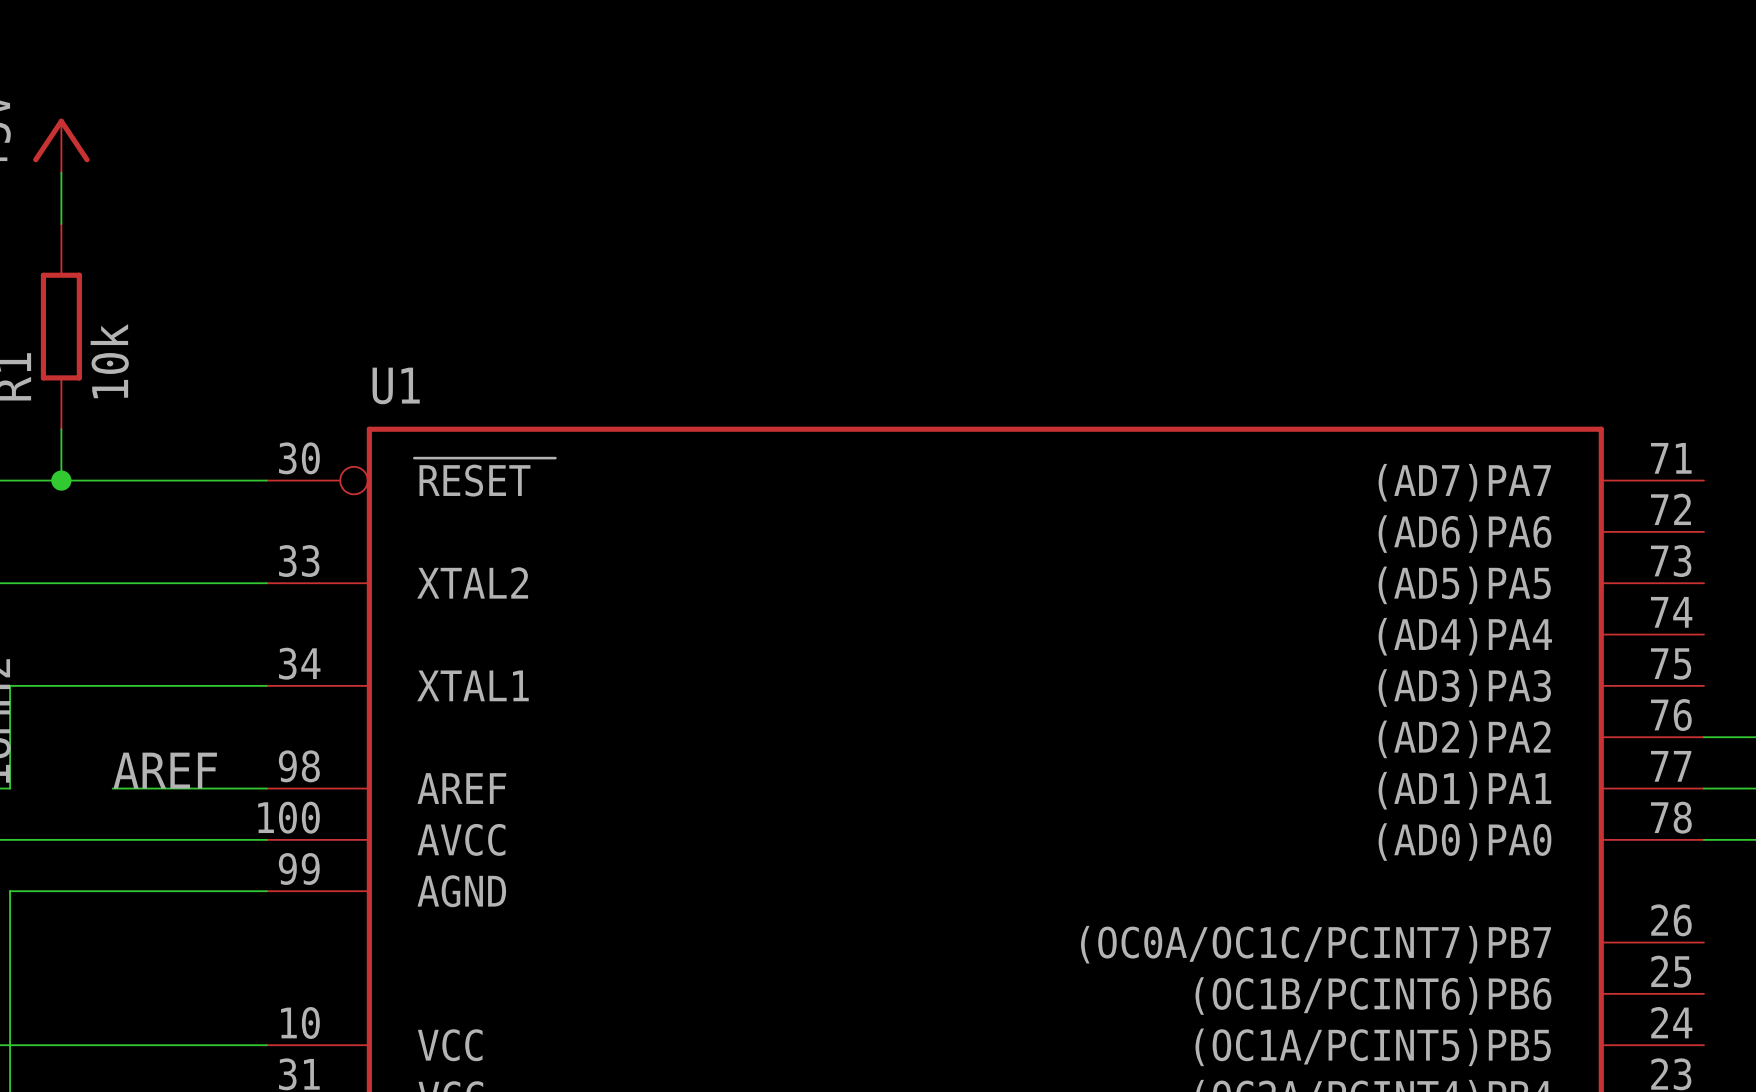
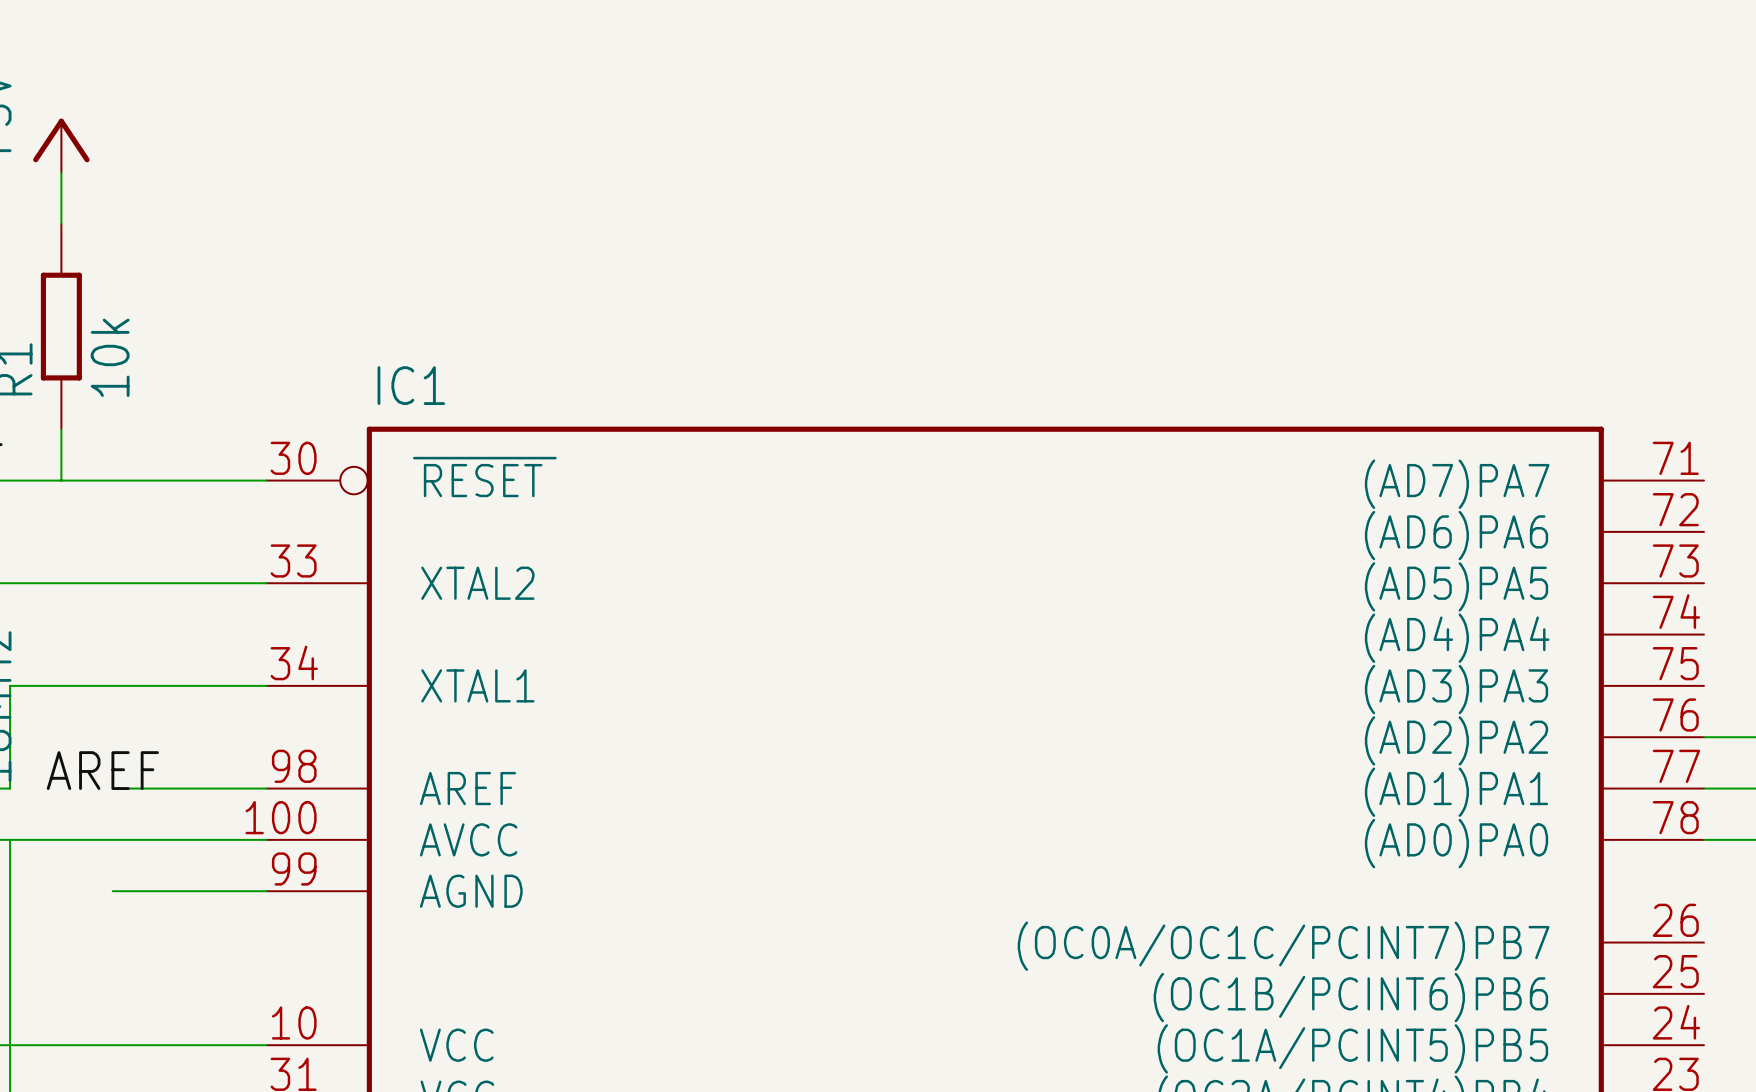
U1 name: U1 (396, 385) -> IC1 (411, 385)
junction: (61, 480) -> none
label position: AREF (165, 770) -> AREF (102, 770)
wire: (10, 891) (112, 891) -> (10, 891) (10, 839)

